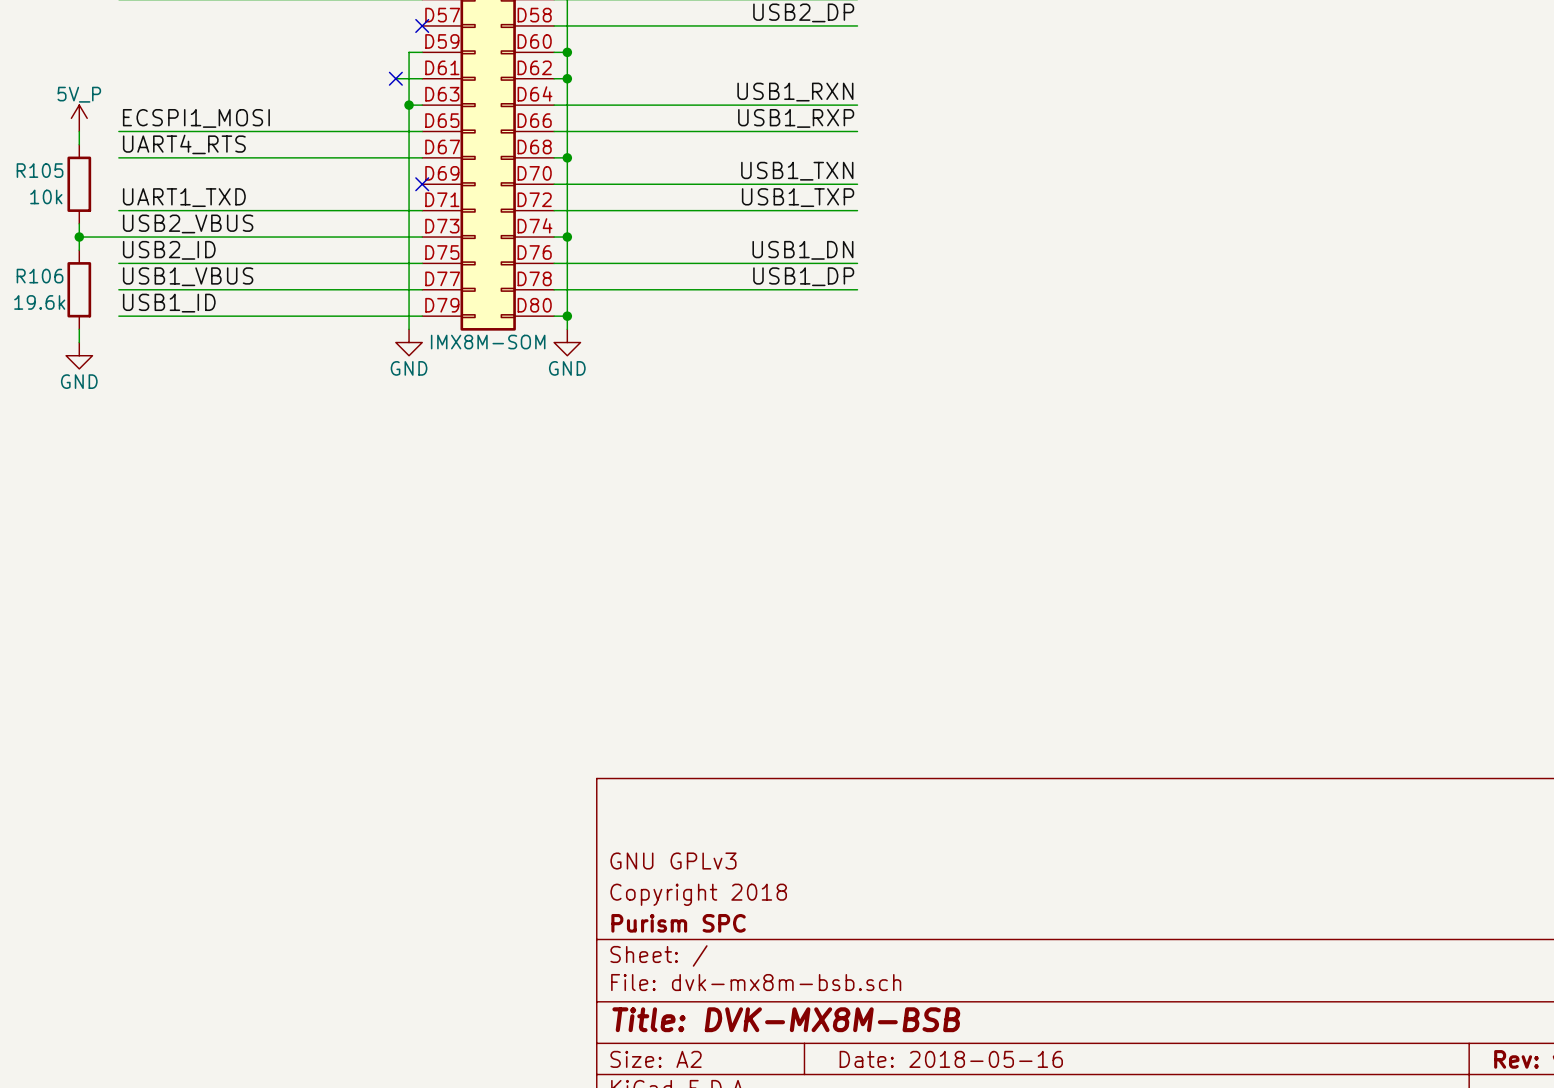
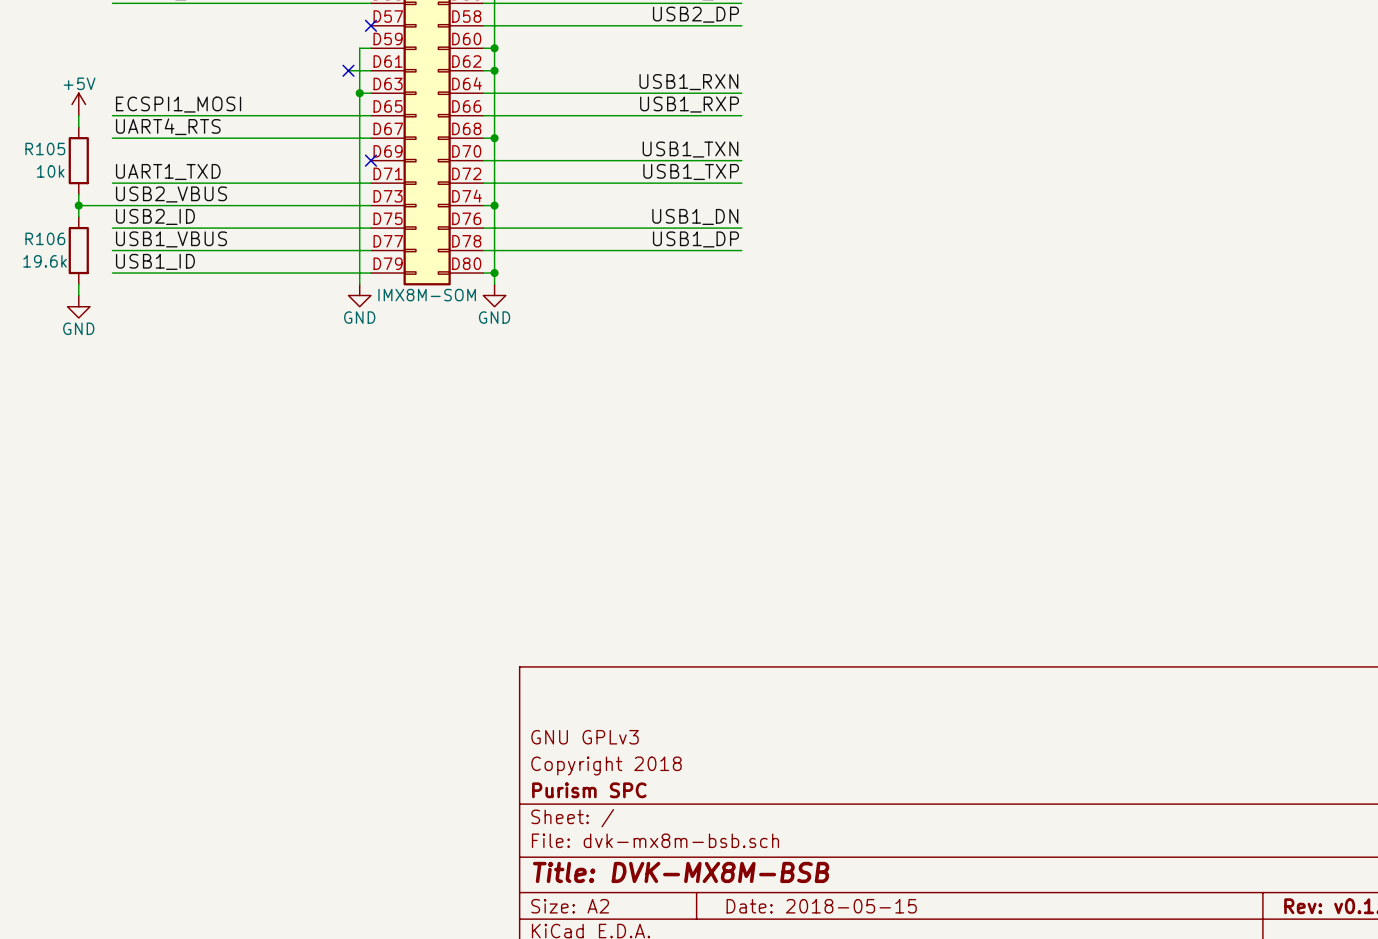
power symbol: 5V_P (79, 118) -> +5V (78, 104)
title block: Date: 2018-05-16 (951, 1059) -> Date: 2018-05-15 (821, 906)

